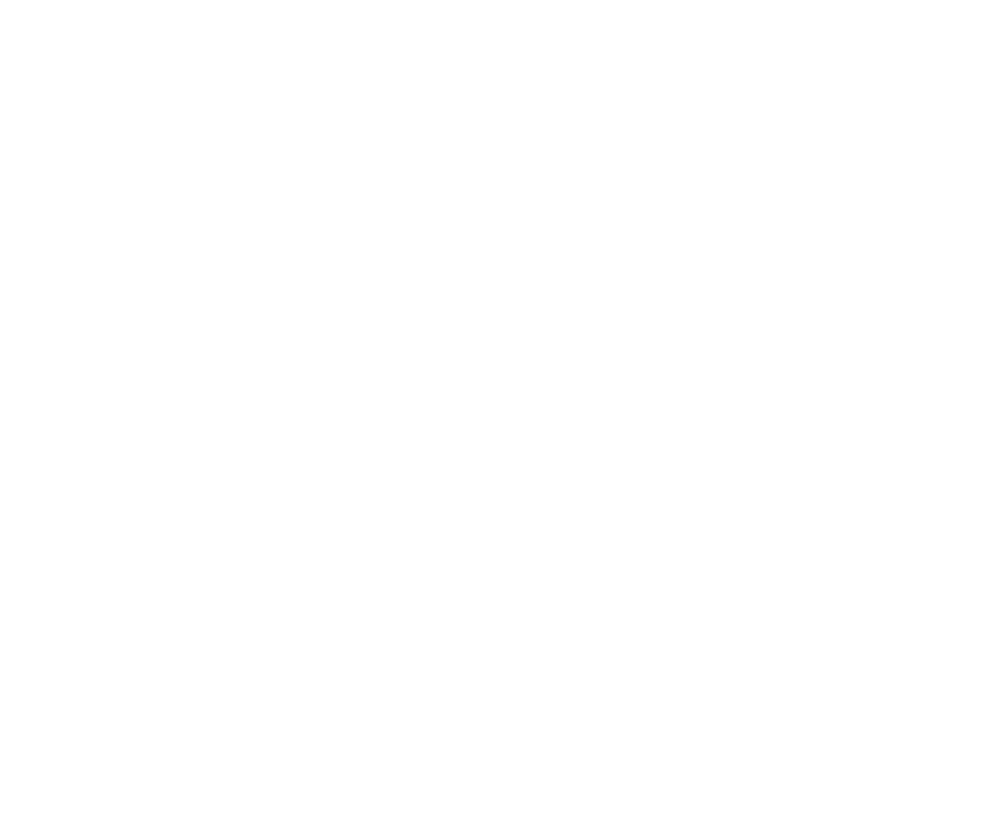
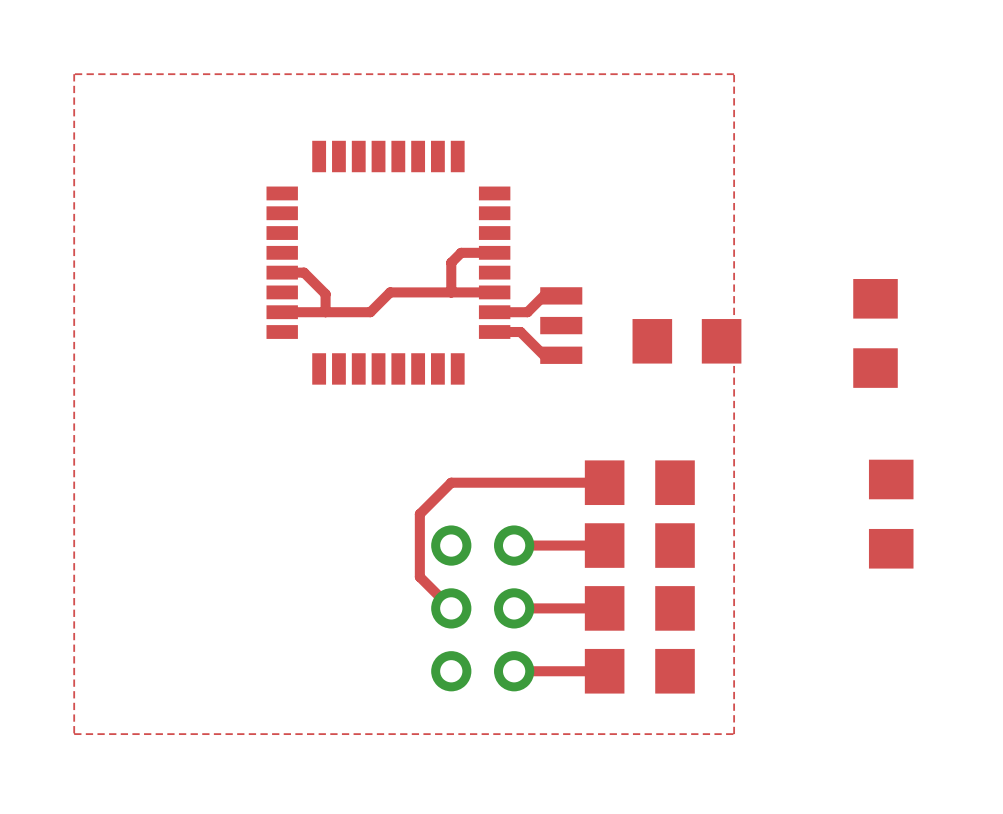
top zone outline: none -> (734, 74) (74, 74) (74, 734) (734, 734) (734, 74)
top track: none -> (494, 252) (461, 252) (451, 262) (451, 292)
part: none -> (388, 262)
top track: none -> (282, 272) (304, 272) (325, 294) (325, 312)
top track: none -> (494, 292) (390, 292) (370, 312) (282, 312)
top track: none -> (561, 295) (559, 294) (545, 294) (527, 312) (494, 312)
part: none -> (561, 325)
top track: none -> (494, 332) (520, 332) (545, 357) (559, 357) (561, 355)
part: none -> (875, 333)
part: none -> (686, 341)
top track: none -> (604, 482) (451, 482) (419, 514) (419, 576) (451, 608)
part: none -> (639, 482)
part: none -> (891, 514)
top track: none -> (604, 545) (514, 545)
part: none -> (639, 545)
part: none -> (482, 608)
top track: none -> (604, 608) (514, 608)
part: none -> (639, 608)
top track: none -> (604, 671) (514, 671)
part: none -> (639, 671)

